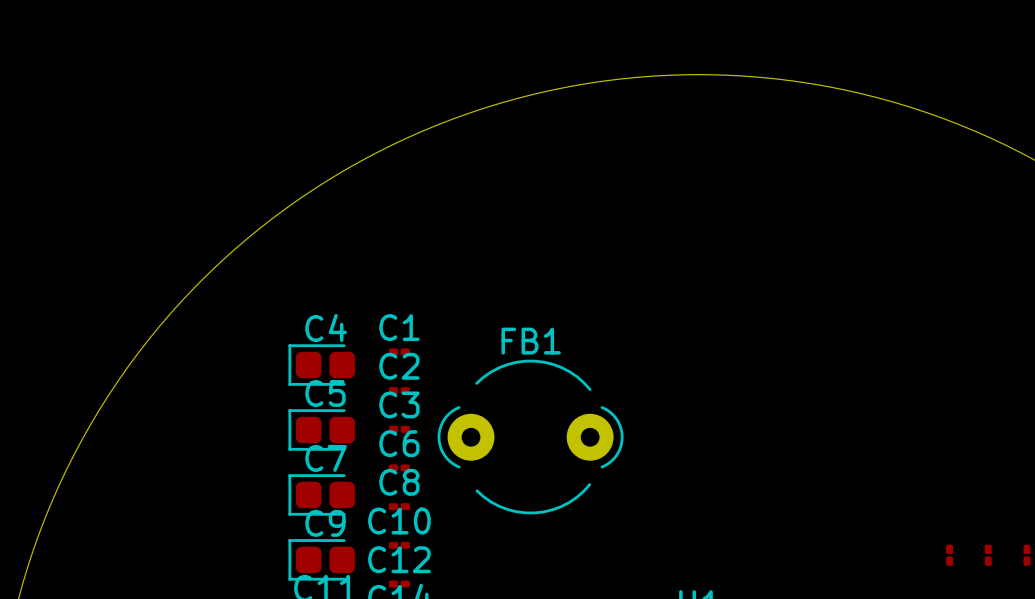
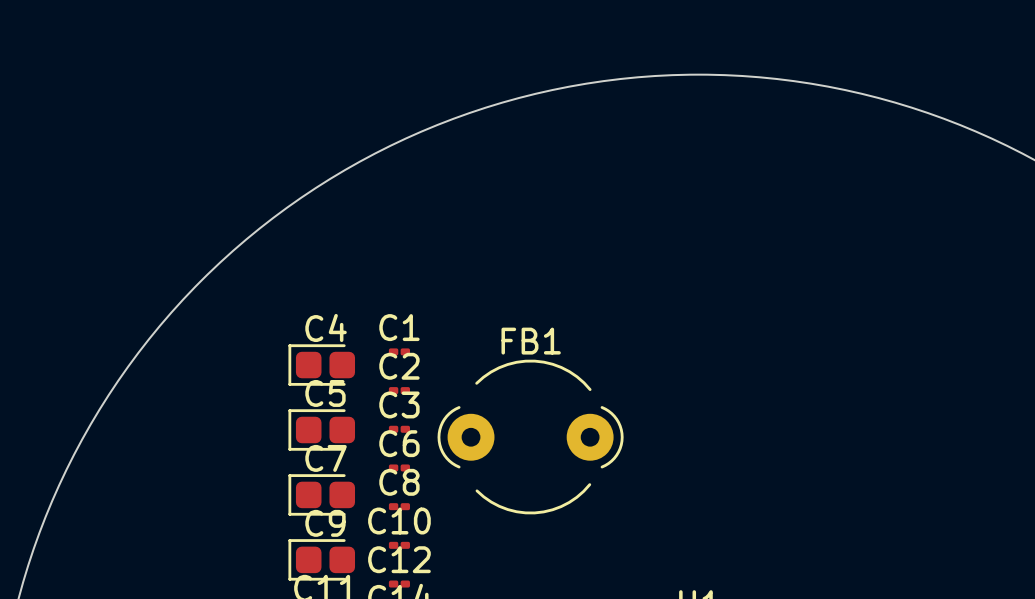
part: (949, 555) -> none
part: (988, 555) -> none
part: (1026, 555) -> none

